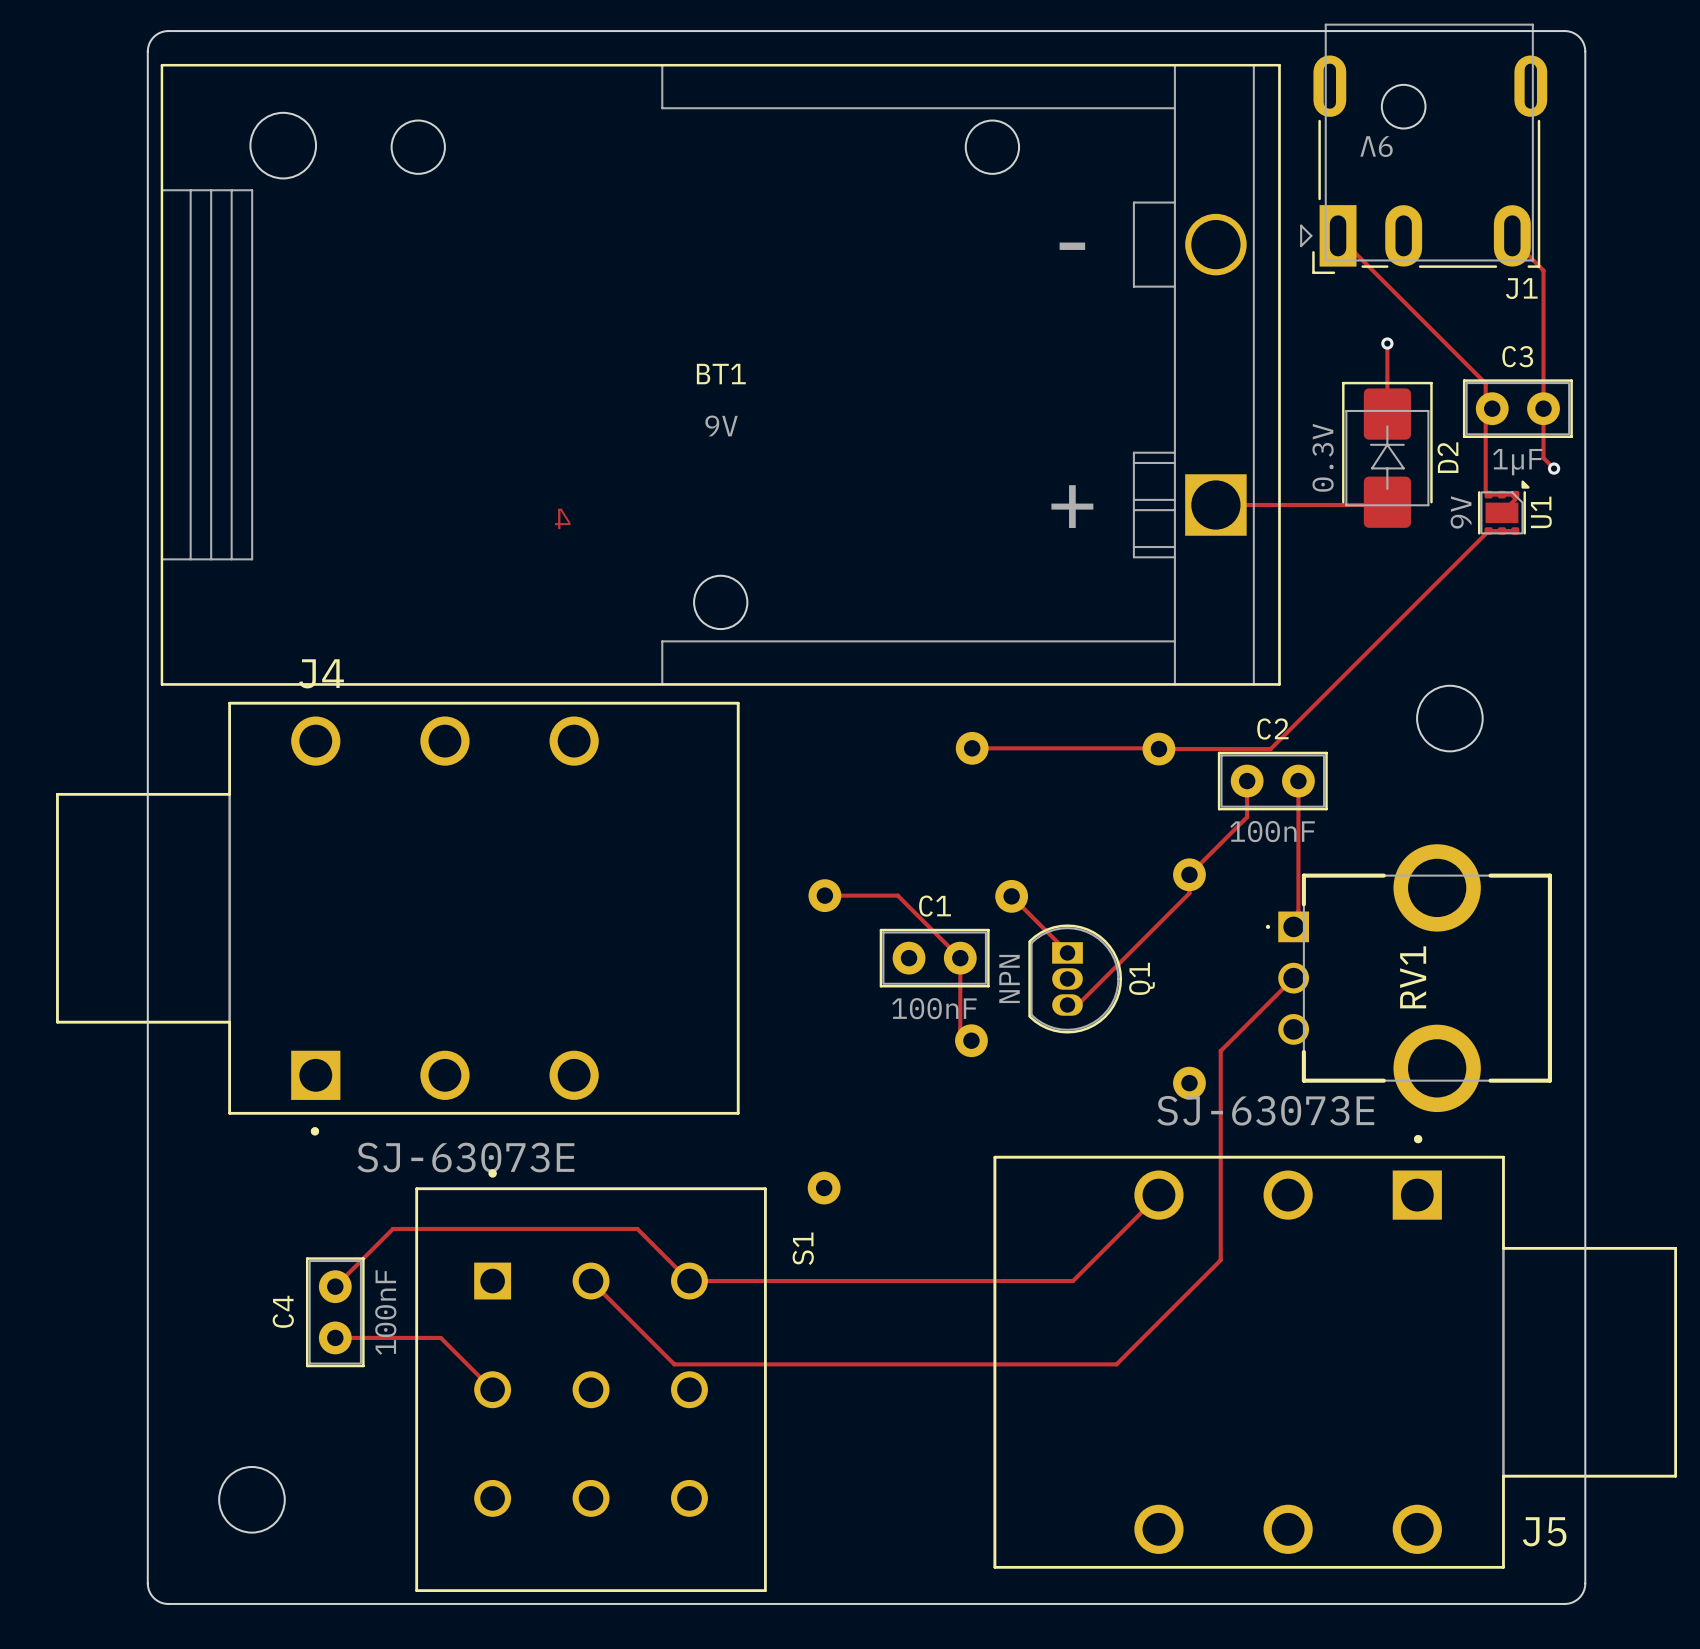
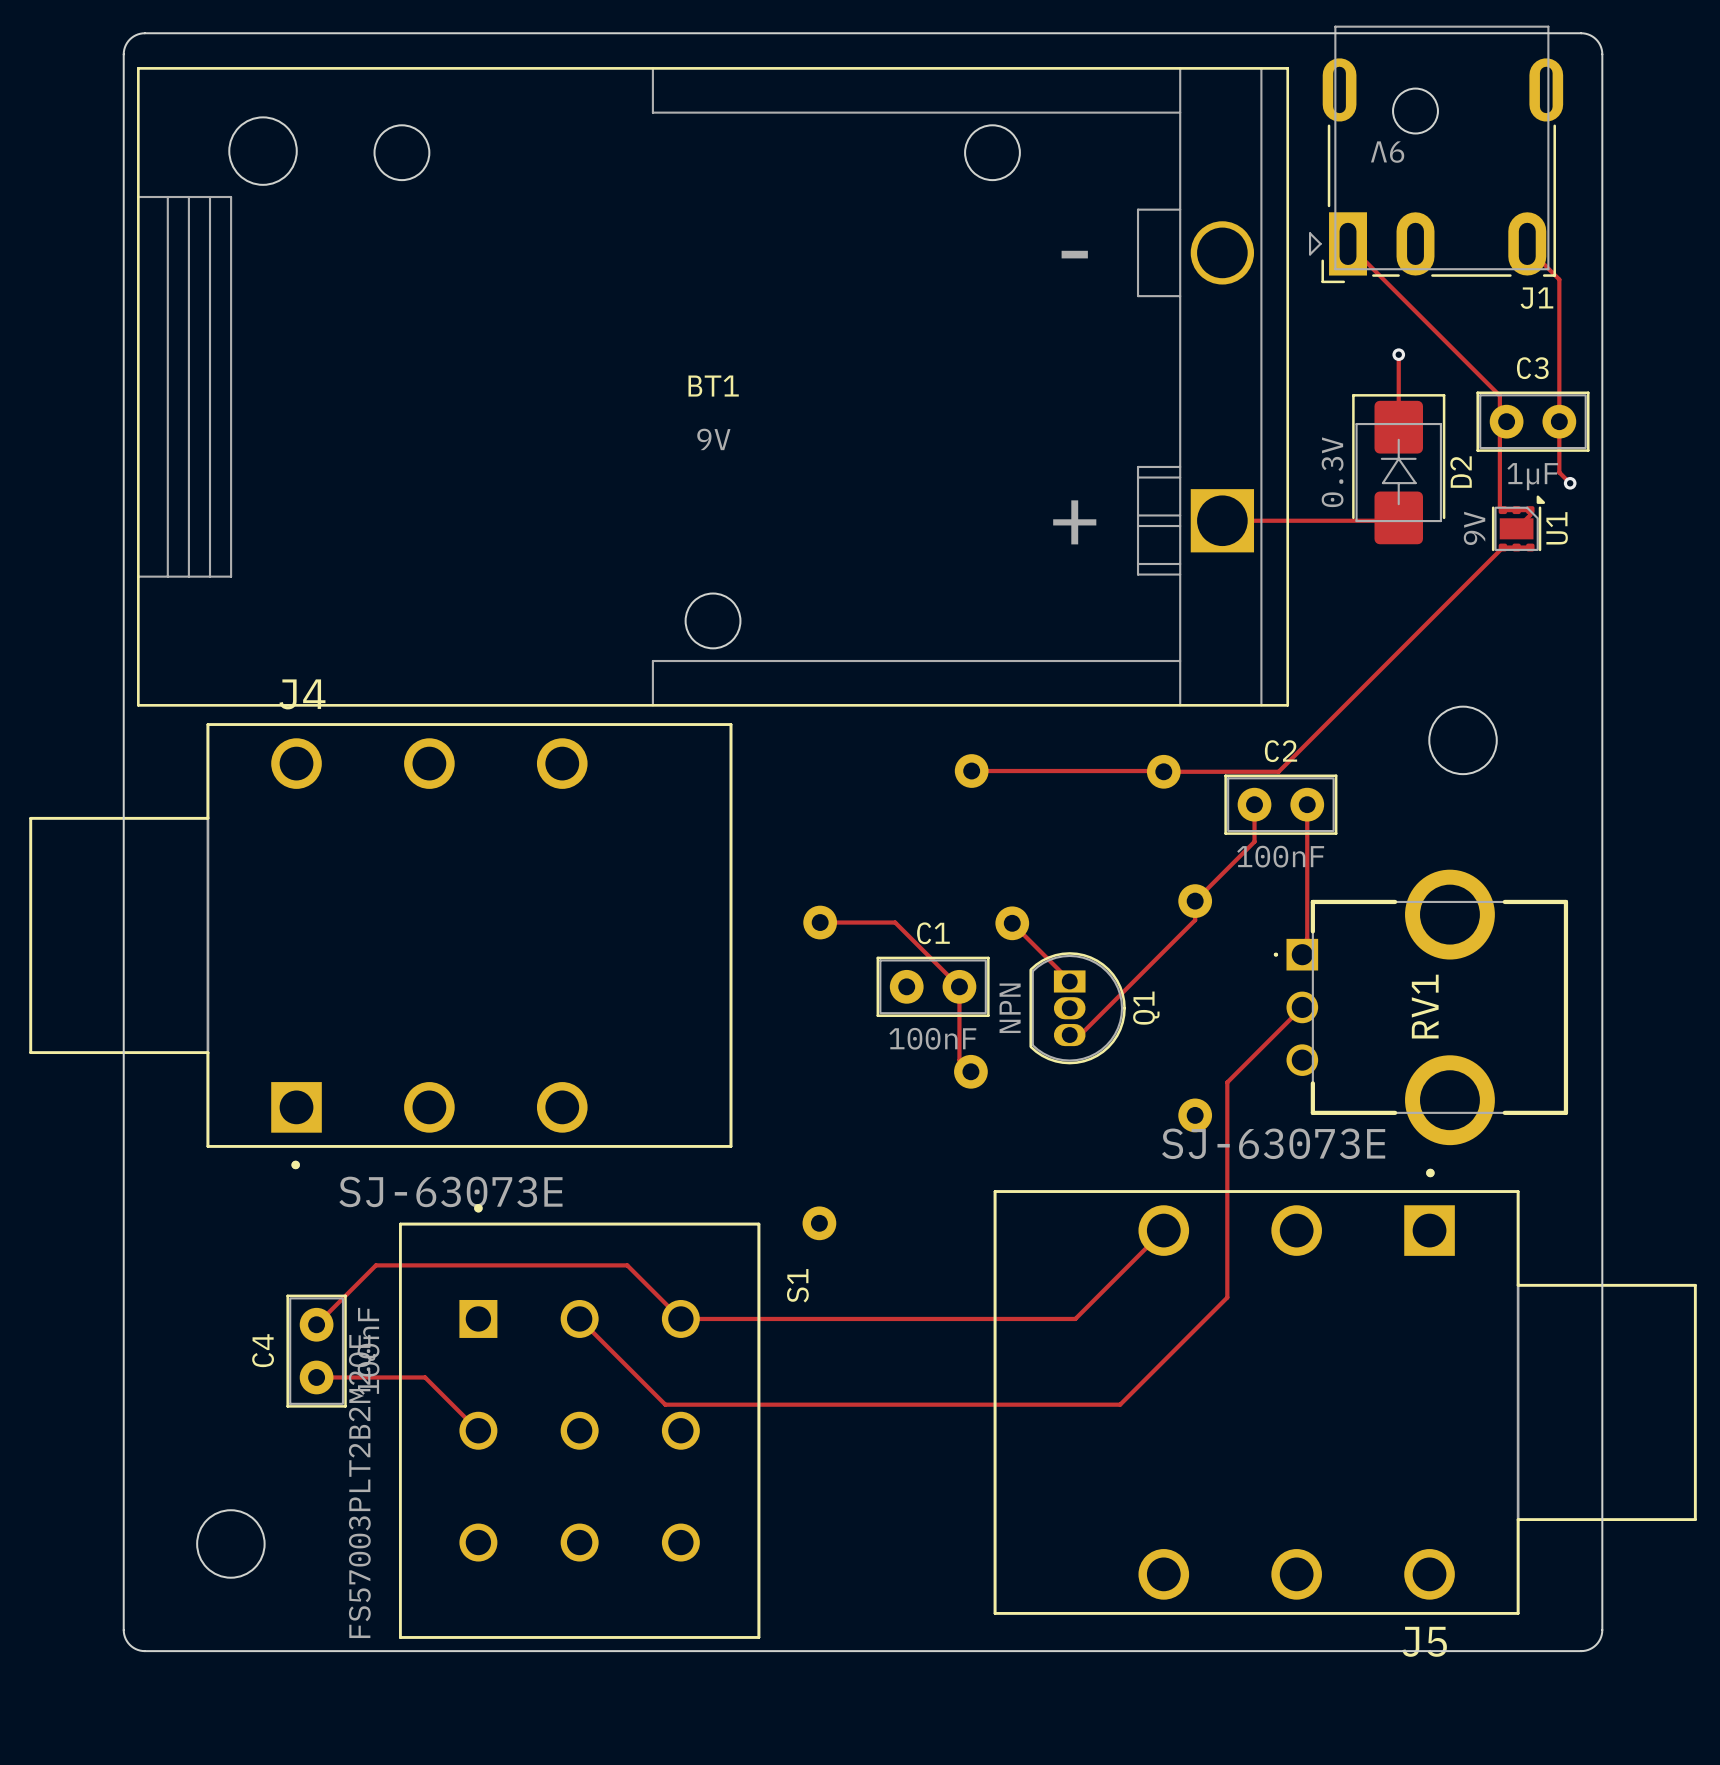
drawing: [555, 508, 571, 530] -> none
S1 value: none -> FS57003PLT2B2M2QE (362, 1486)
J5 name position: J5 (1544, 1531) -> J5 (1424, 1641)

